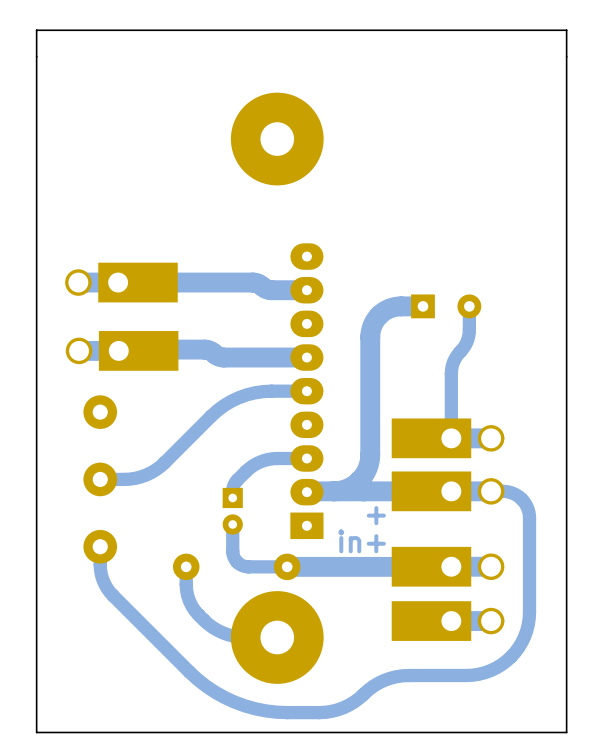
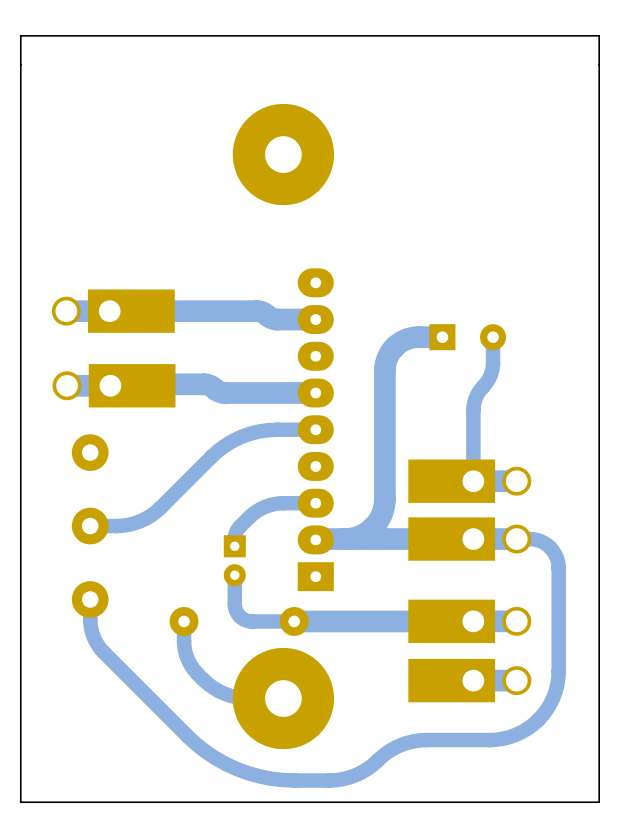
text: + (376, 515) -> none
text: in+ (362, 541) -> none

